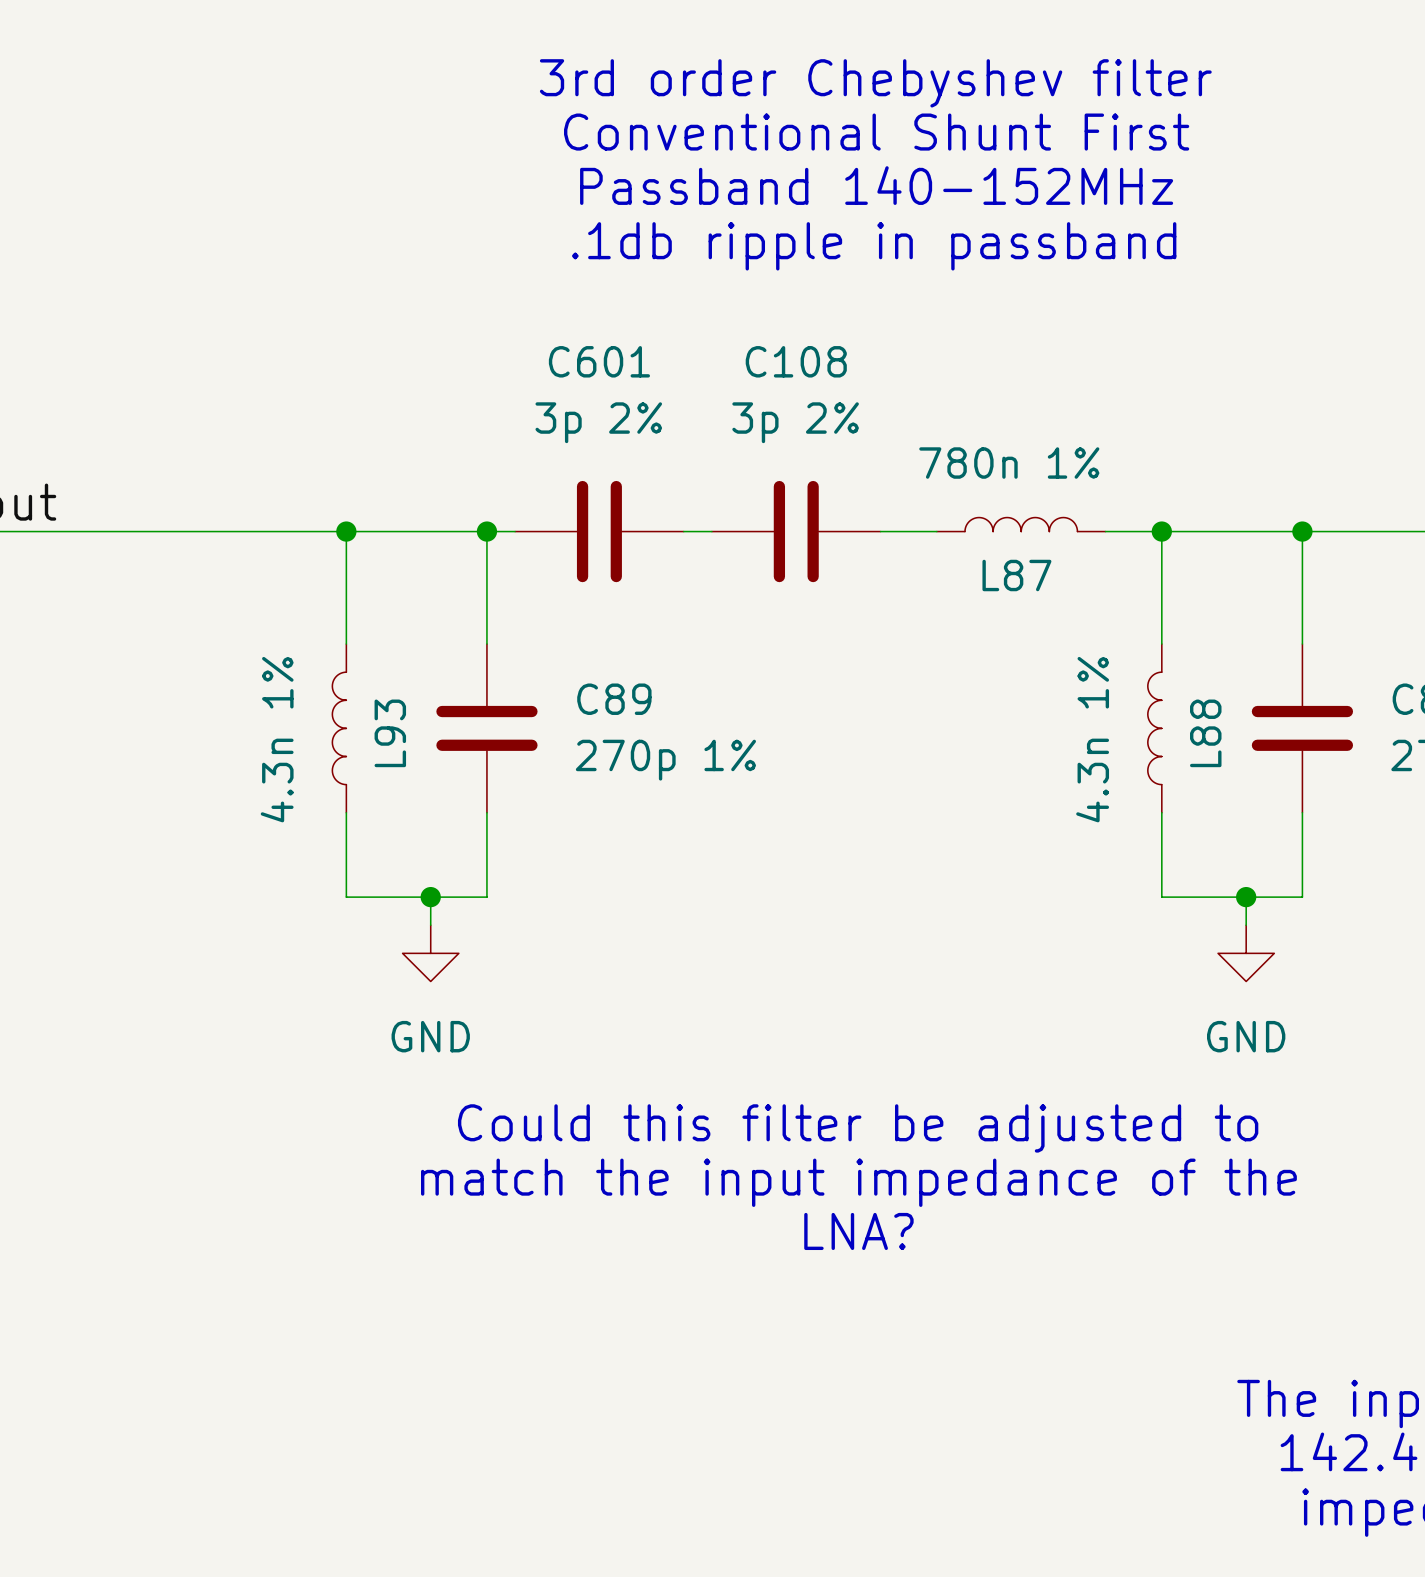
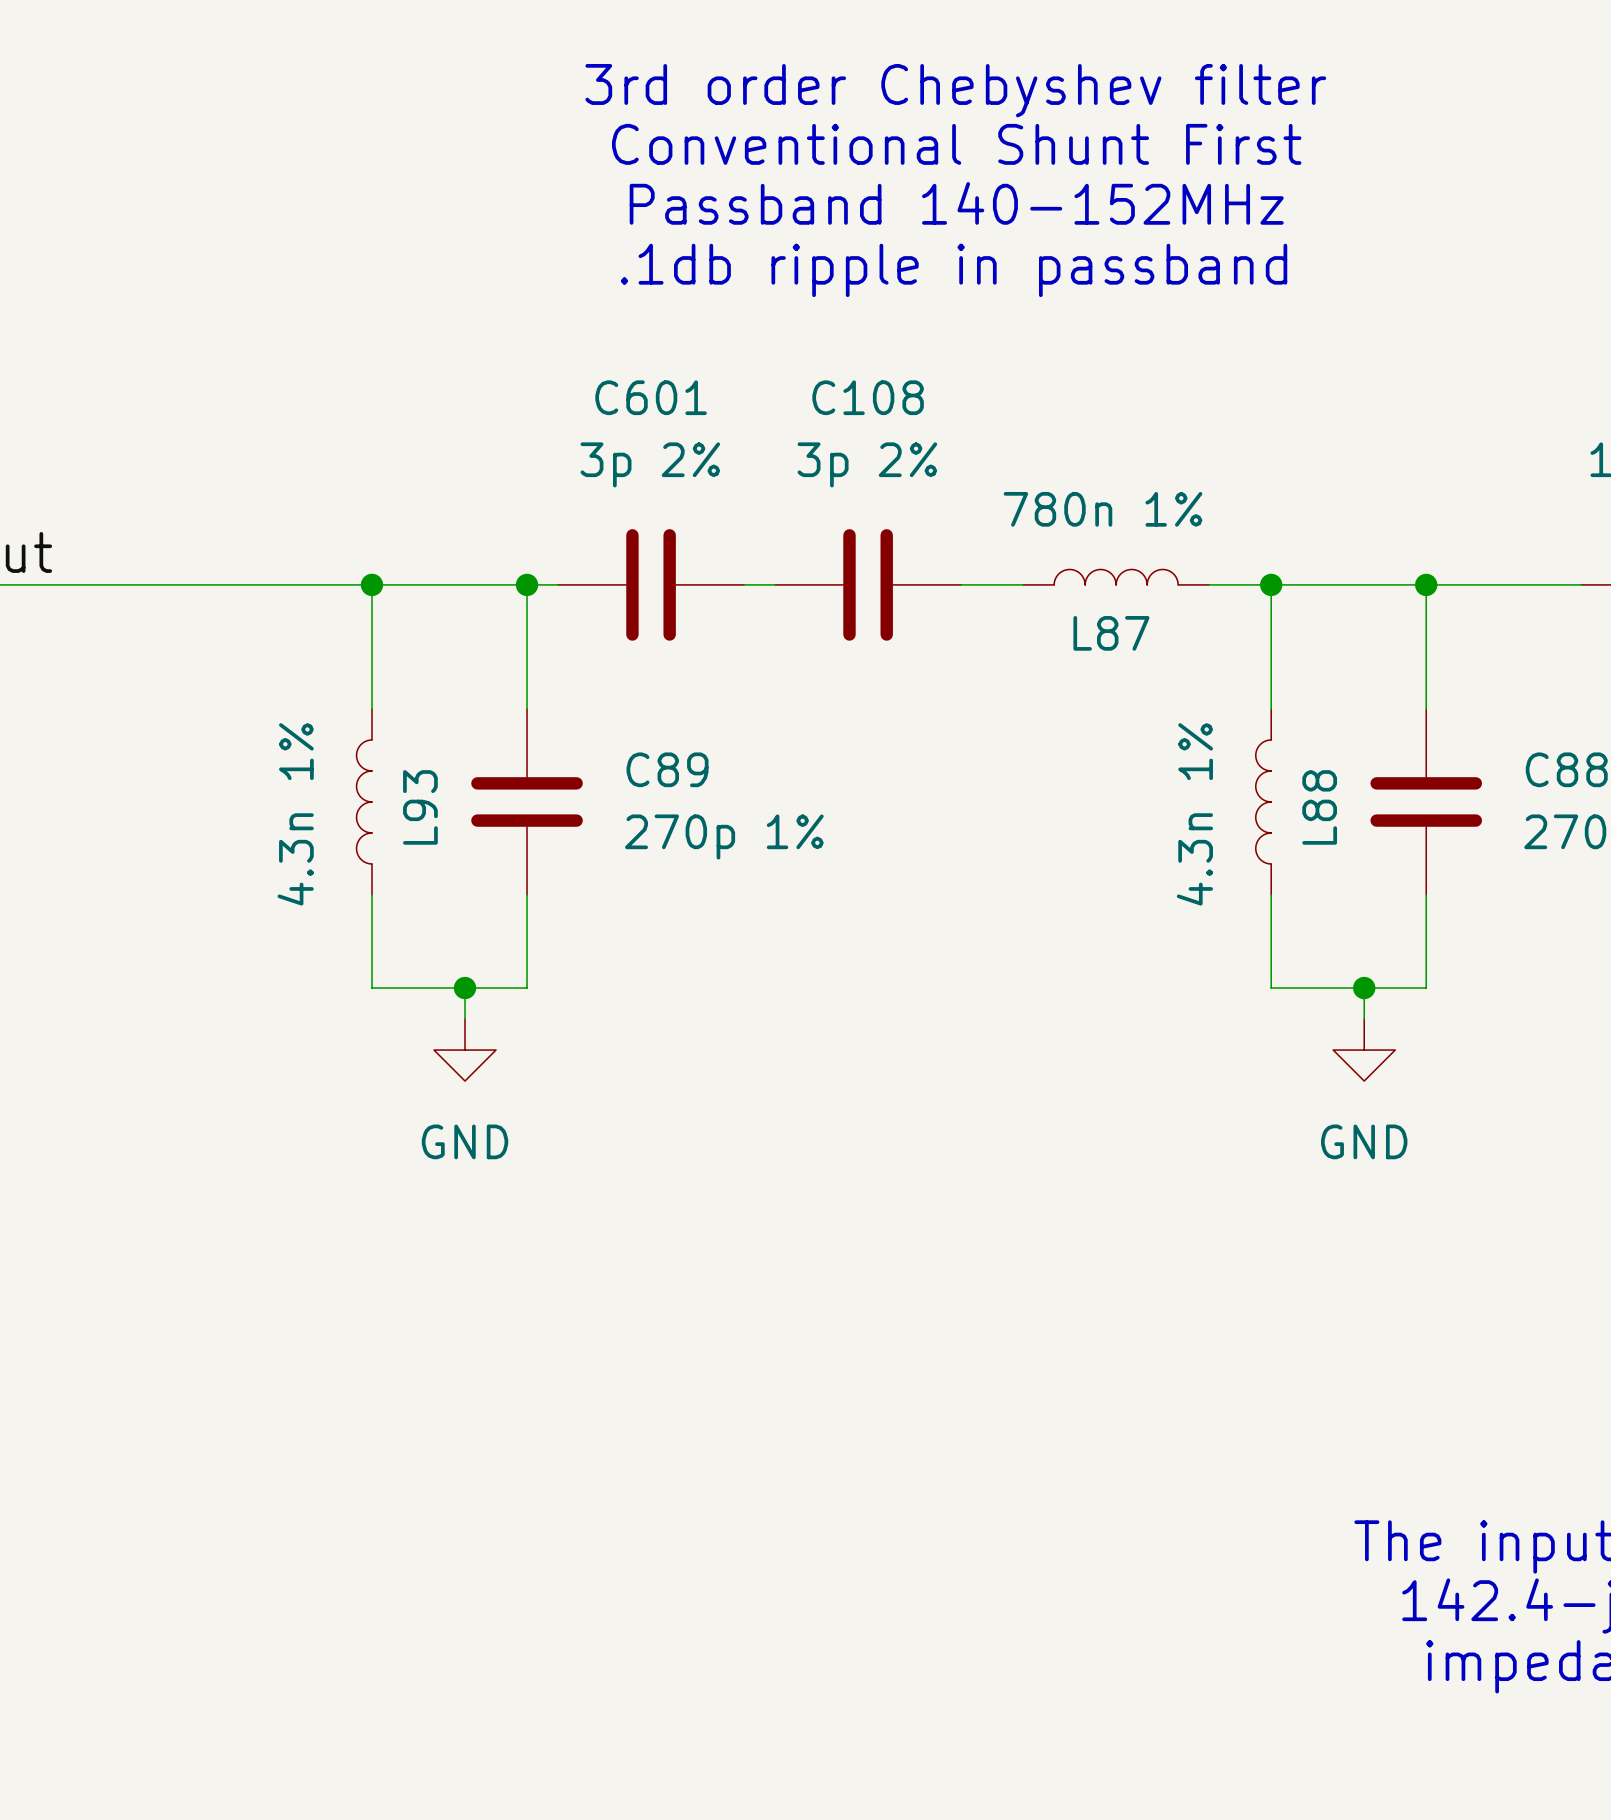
text: Could this filter be adjusted to (858, 1128) -> none
text: match the input impedance of the (858, 1182) -> none
text: LNA? (858, 1231) -> none

